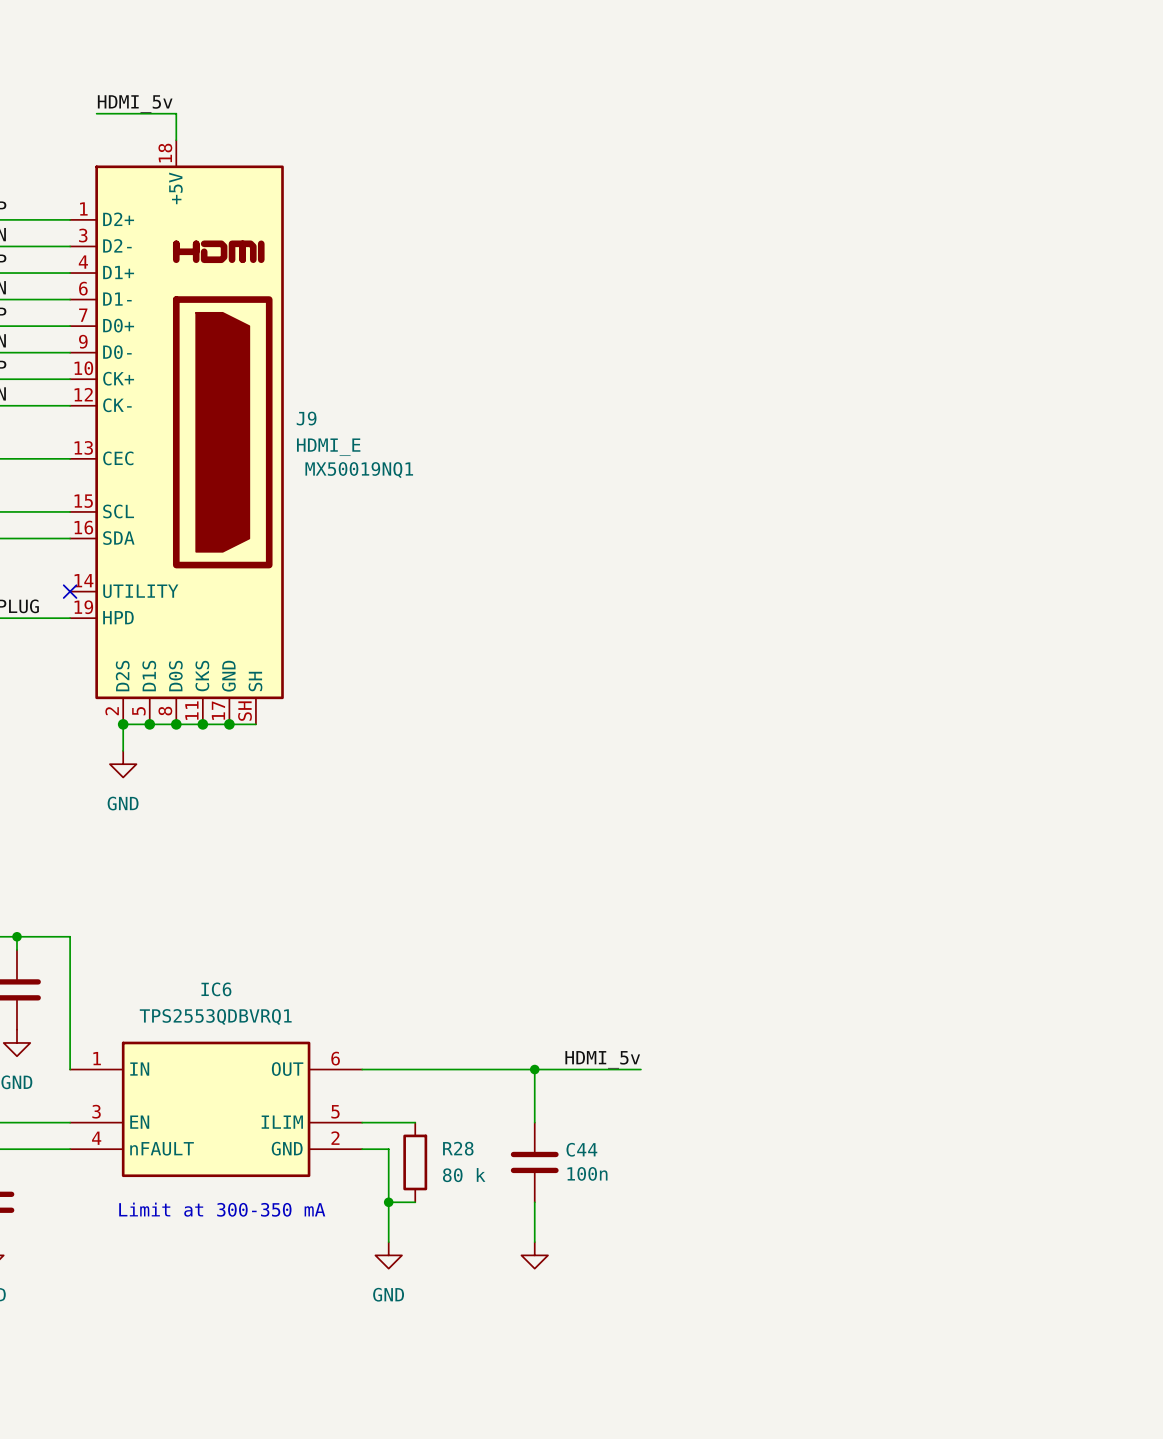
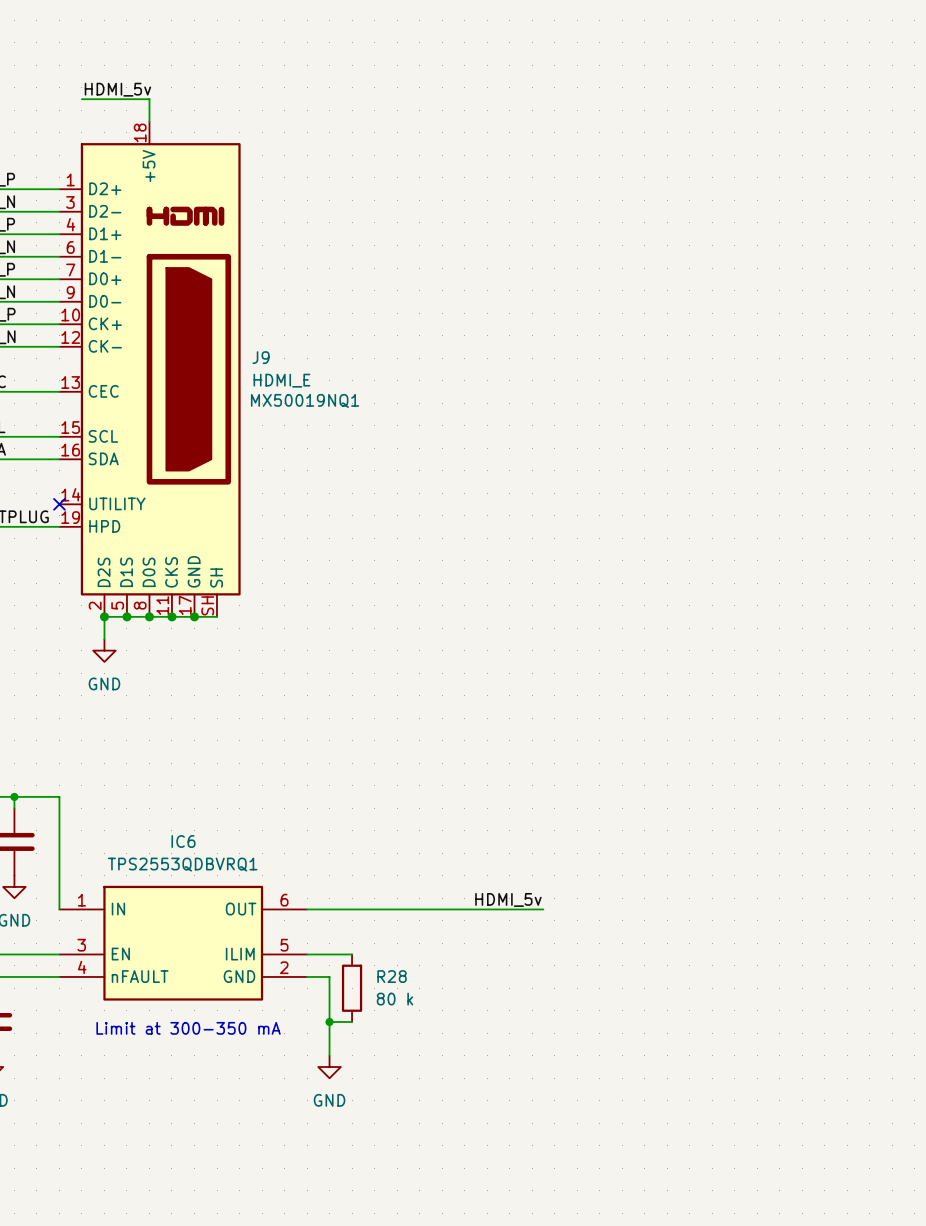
wire: (534, 1069) (534, 1122) -> none
junction: (534, 1069) -> none
C44: 100n (534, 1162) -> none
wire: (534, 1202) (534, 1242) -> none
power symbol: (534, 1255) -> none

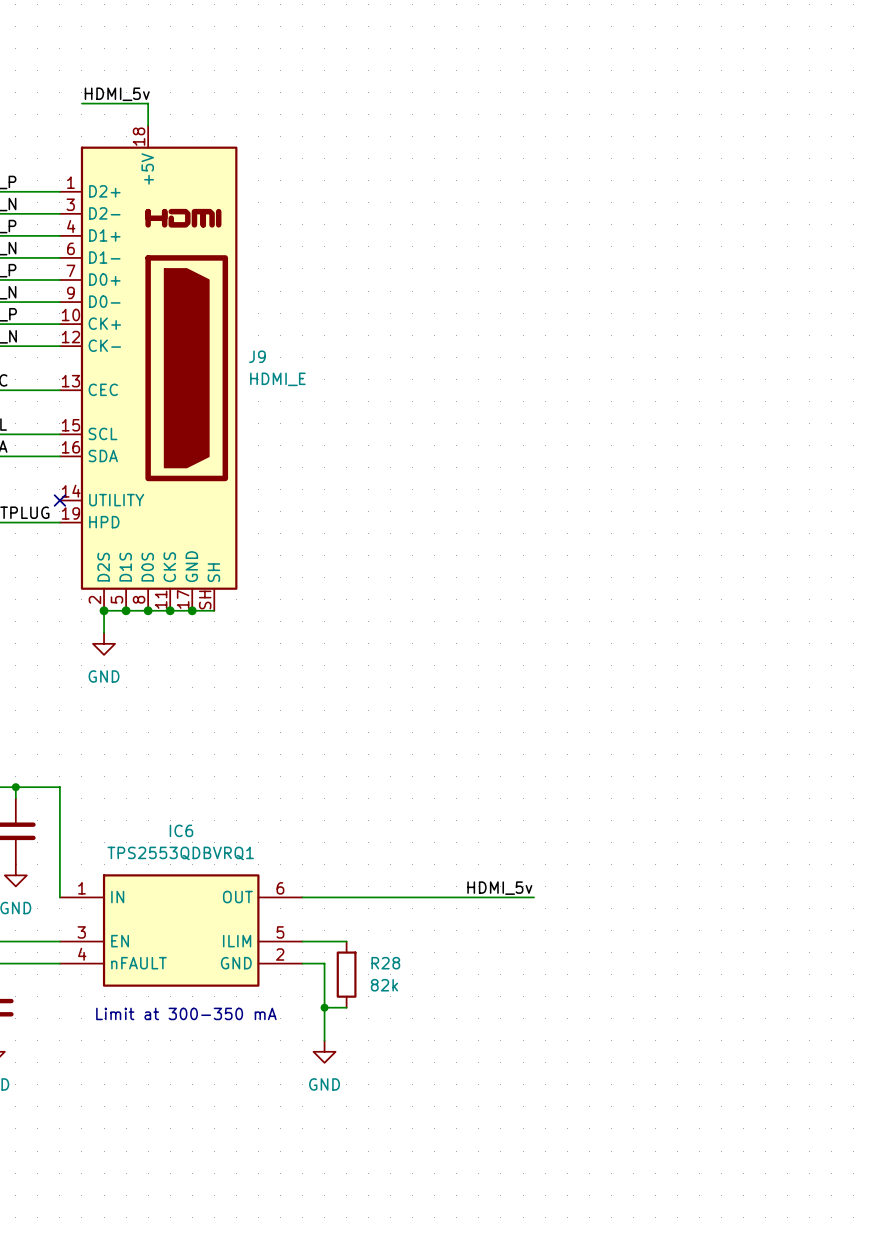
J9 text: MX50019NQ1 (305, 400) -> none
R28 value: 80 k (394, 999) -> 82k (384, 985)

